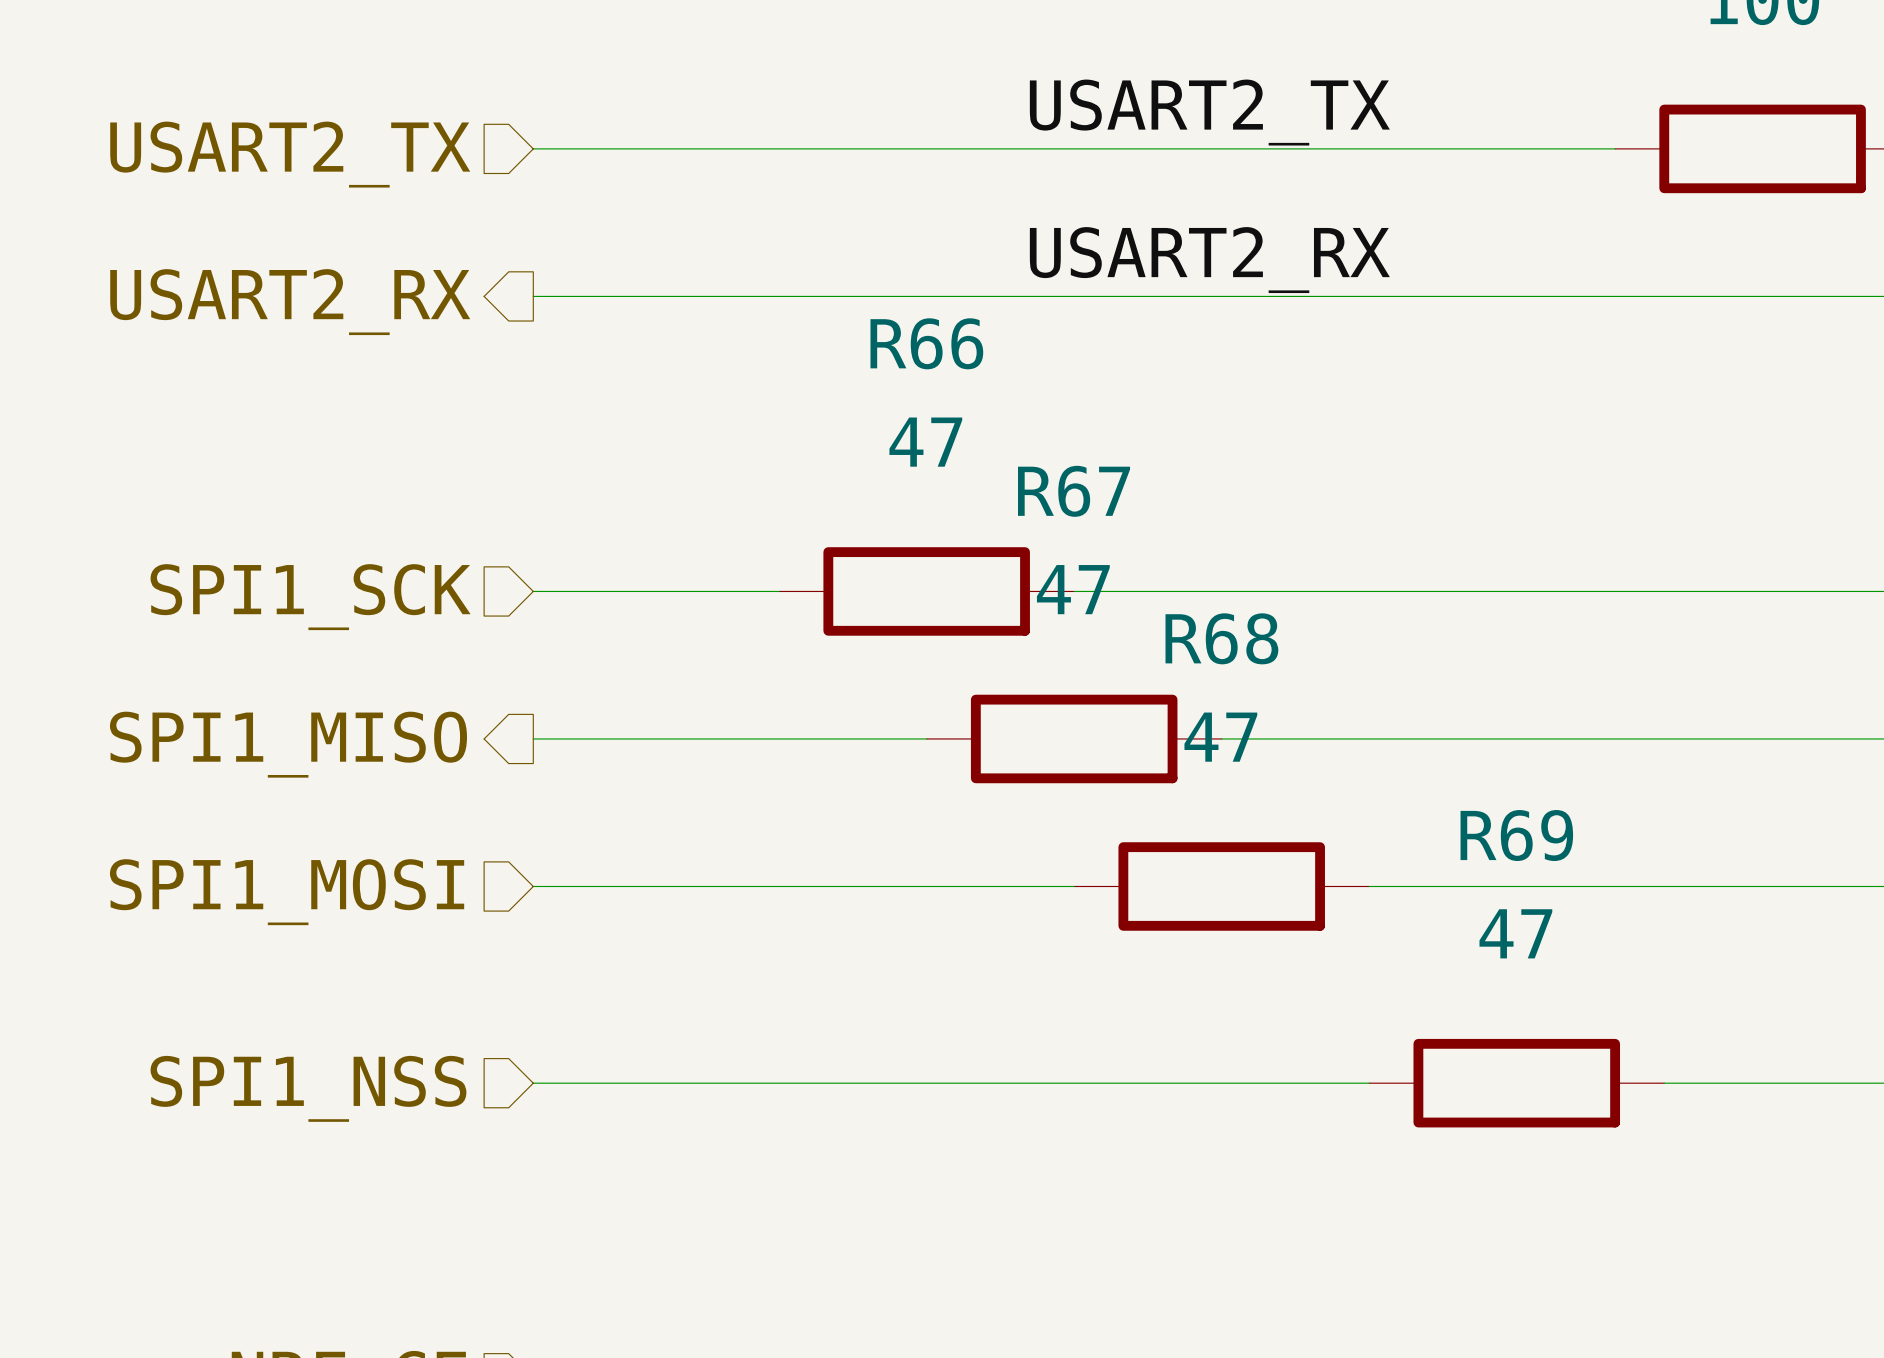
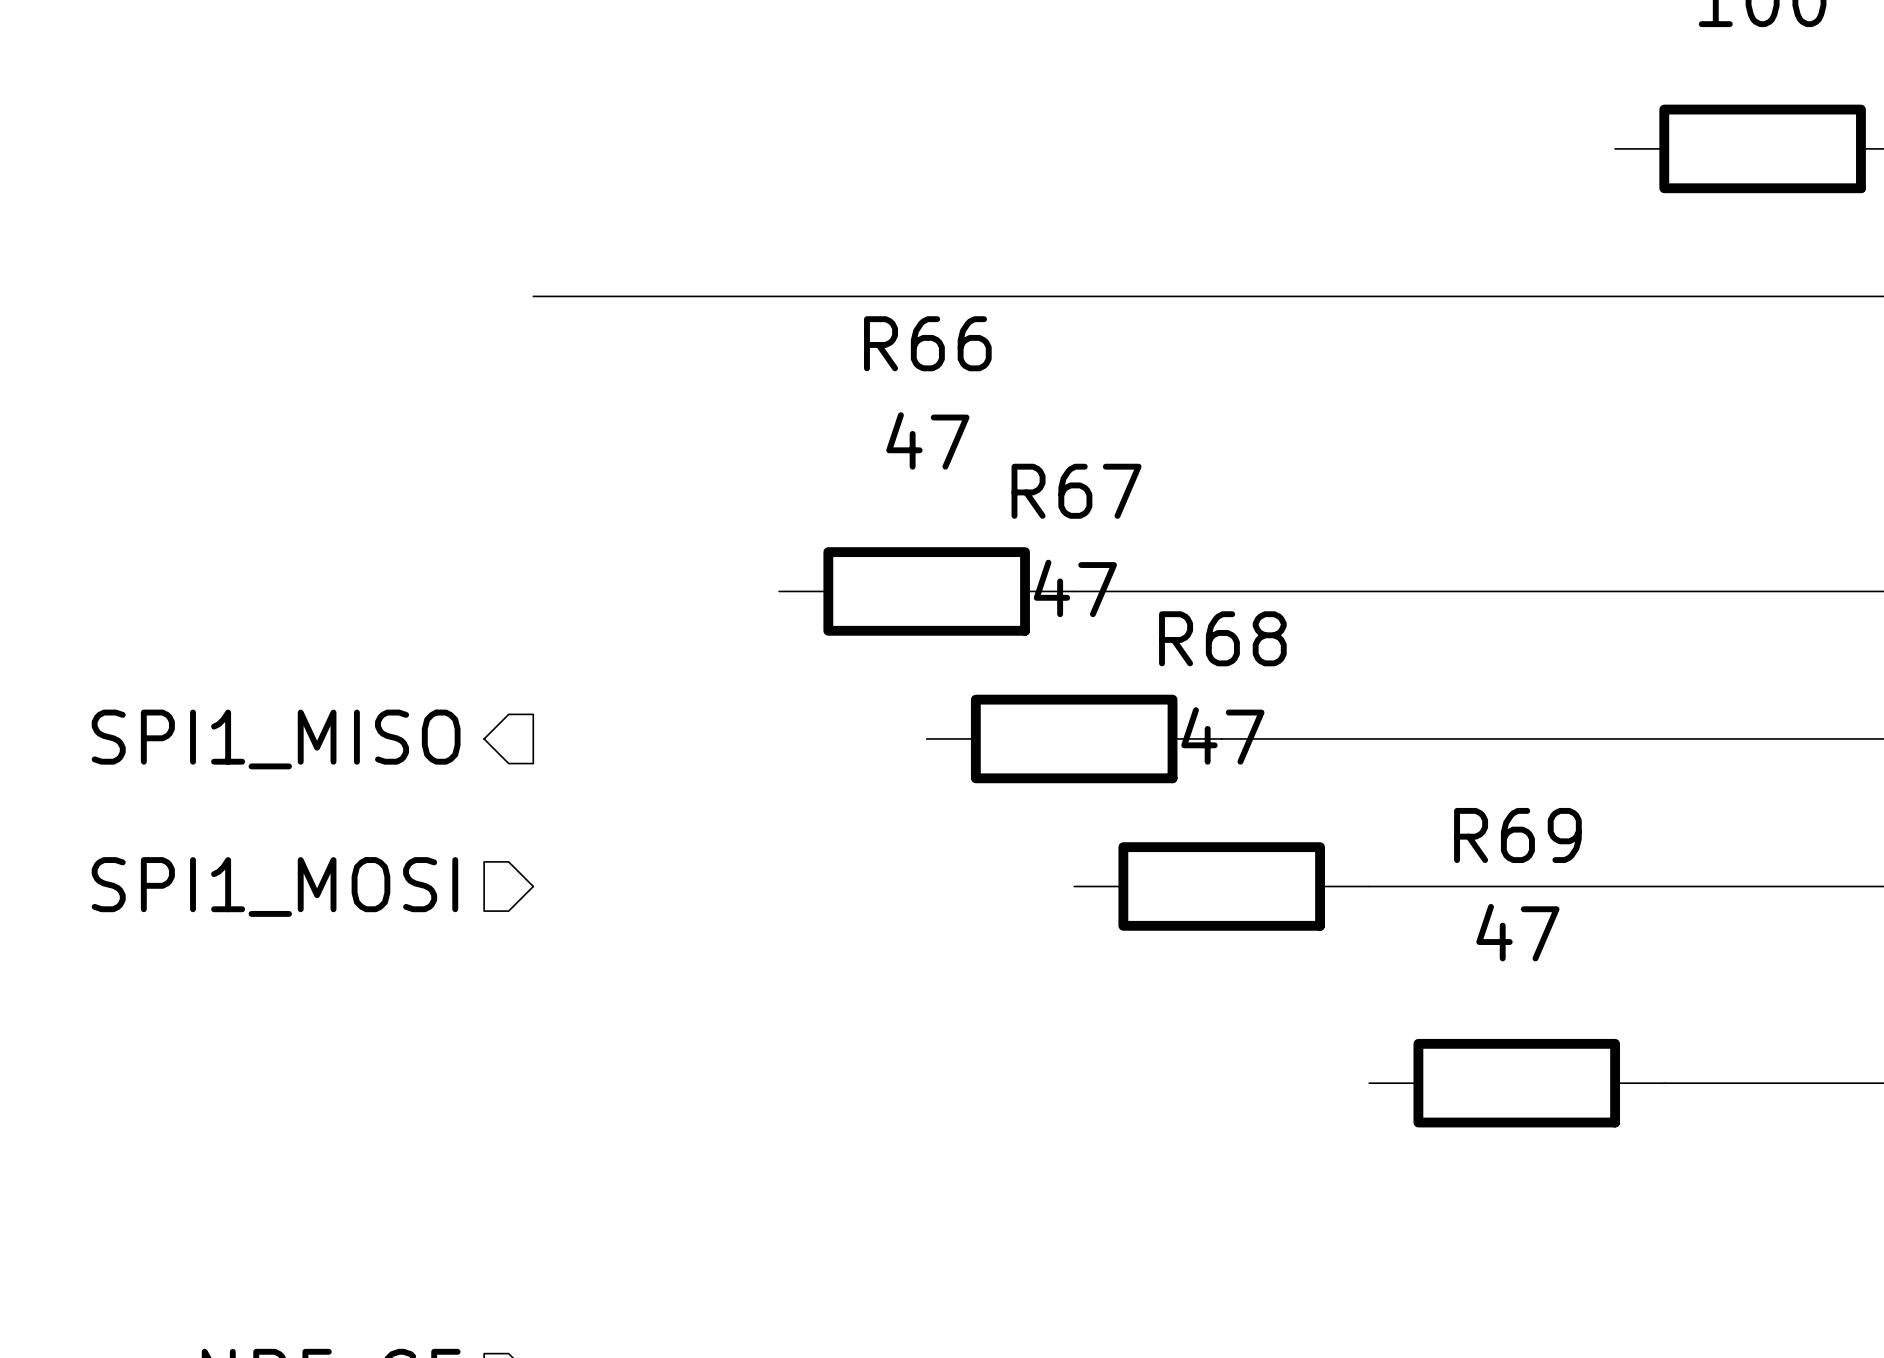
label: USART2_TX (1209, 112) -> none
wire: (533, 148) (1615, 148) -> none
hierarchical label: USART2_TX (290, 154) -> none
label: USART2_RX (1209, 260) -> none
hierarchical label: USART2_RX (290, 302) -> none
wire: (533, 591) (779, 591) -> none
hierarchical label: SPI1_SCK (310, 597) -> none
wire: (533, 738) (926, 738) -> none
wire: (533, 886) (1074, 886) -> none
wire: (533, 1083) (1369, 1083) -> none
hierarchical label: SPI1_NSS (308, 1088) -> none

